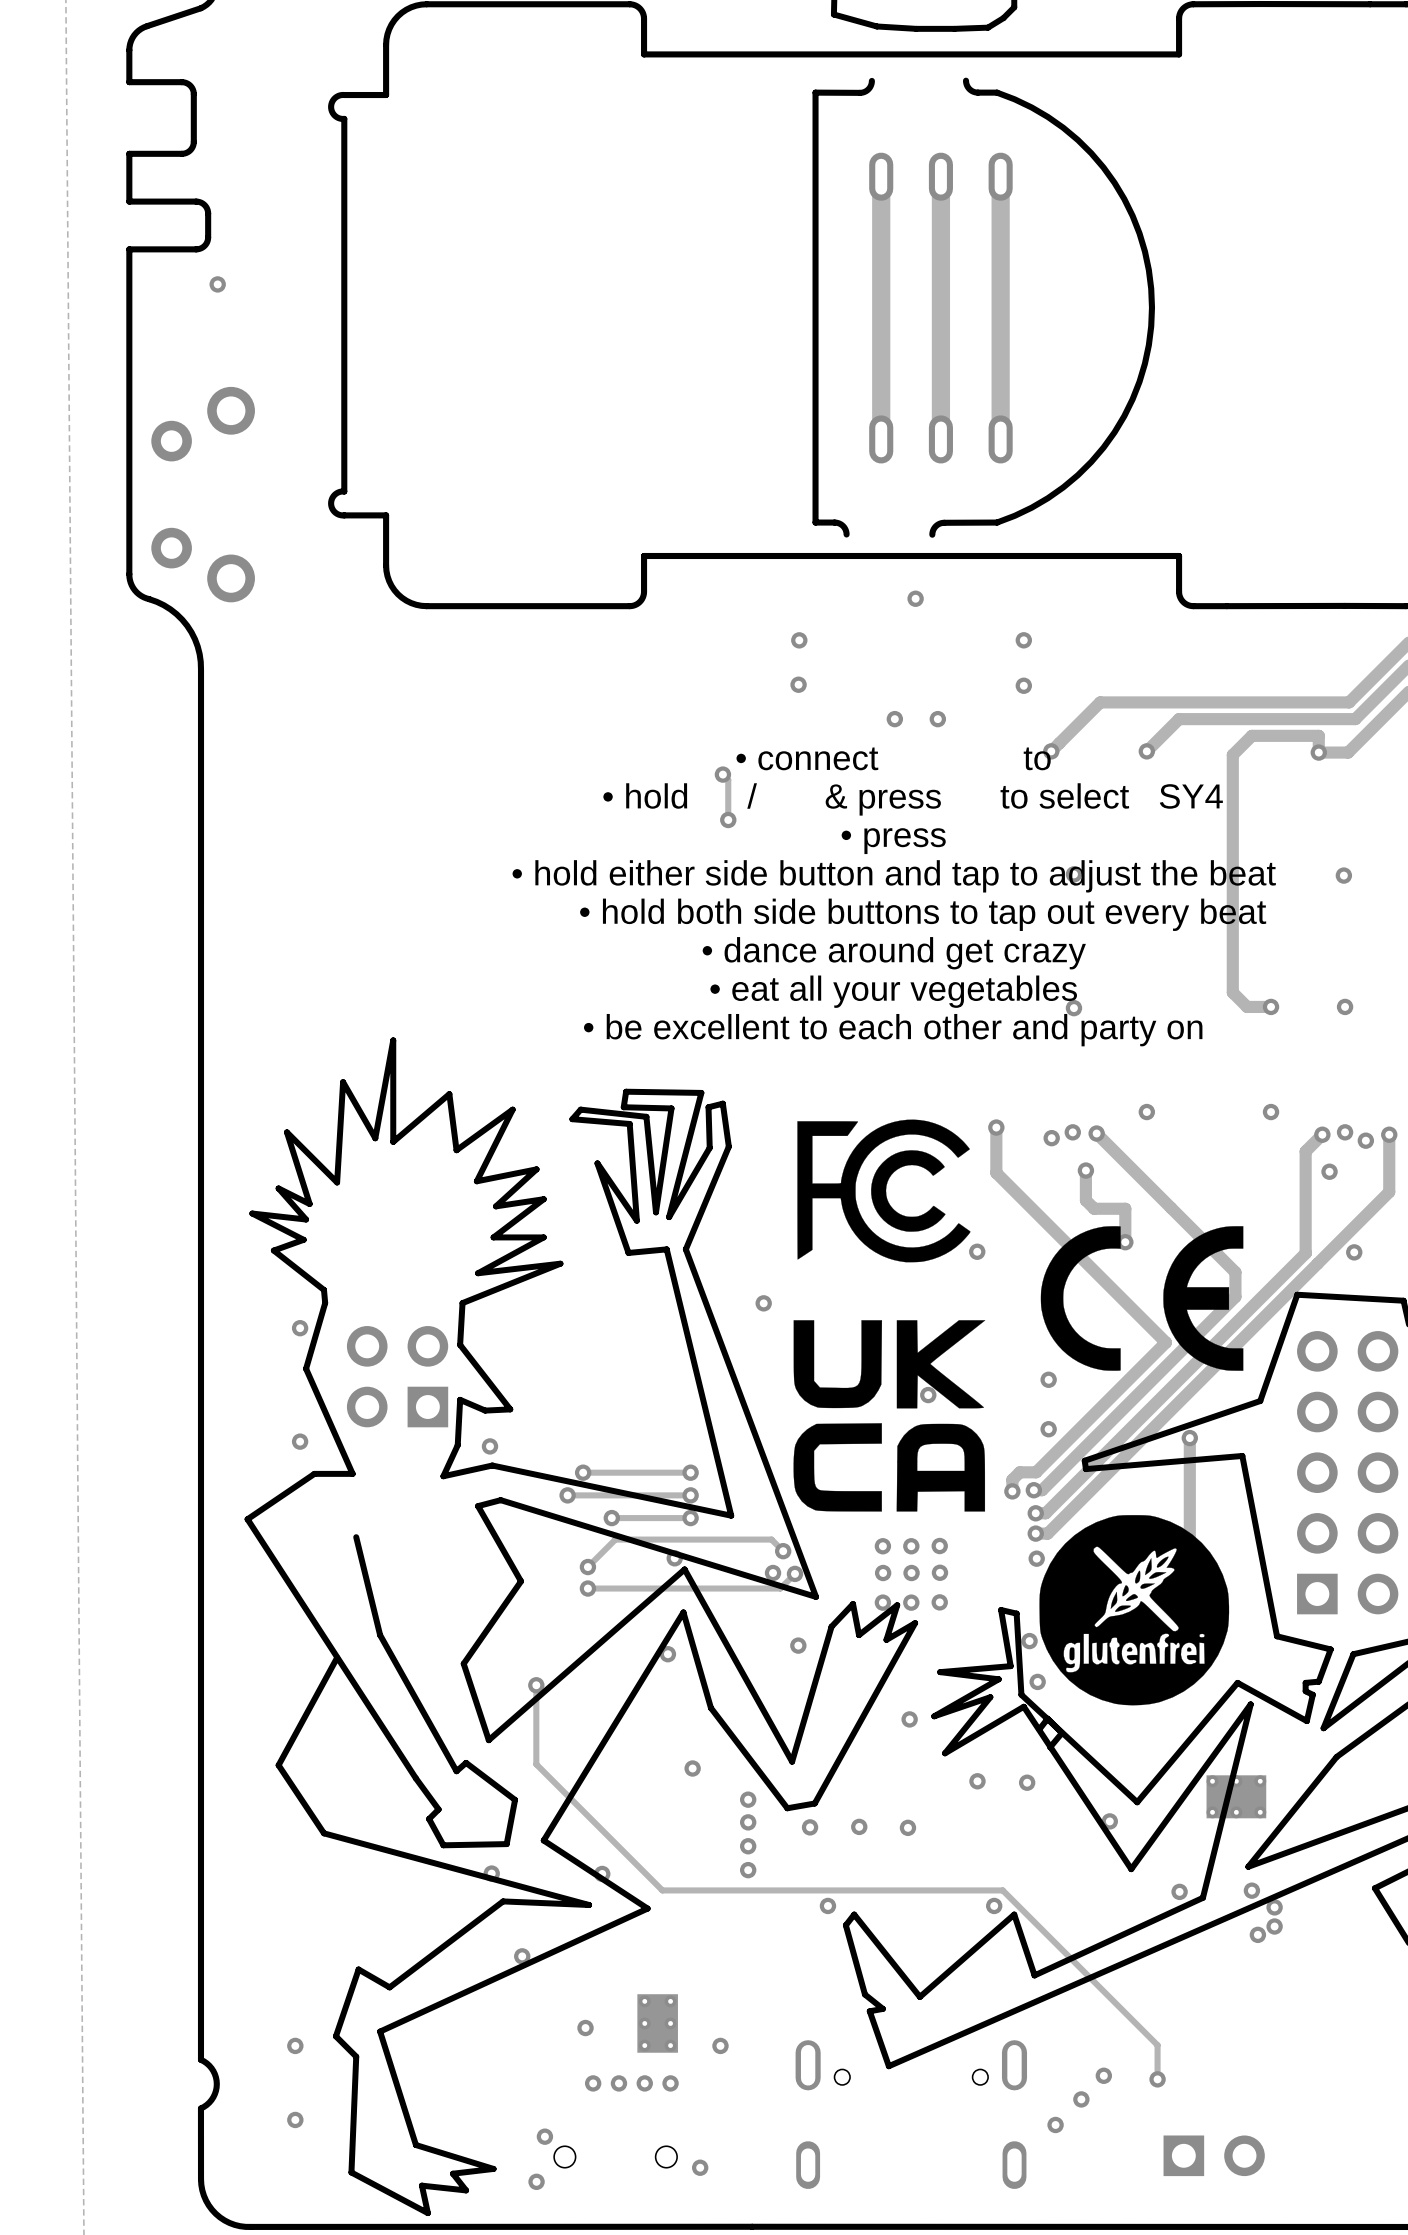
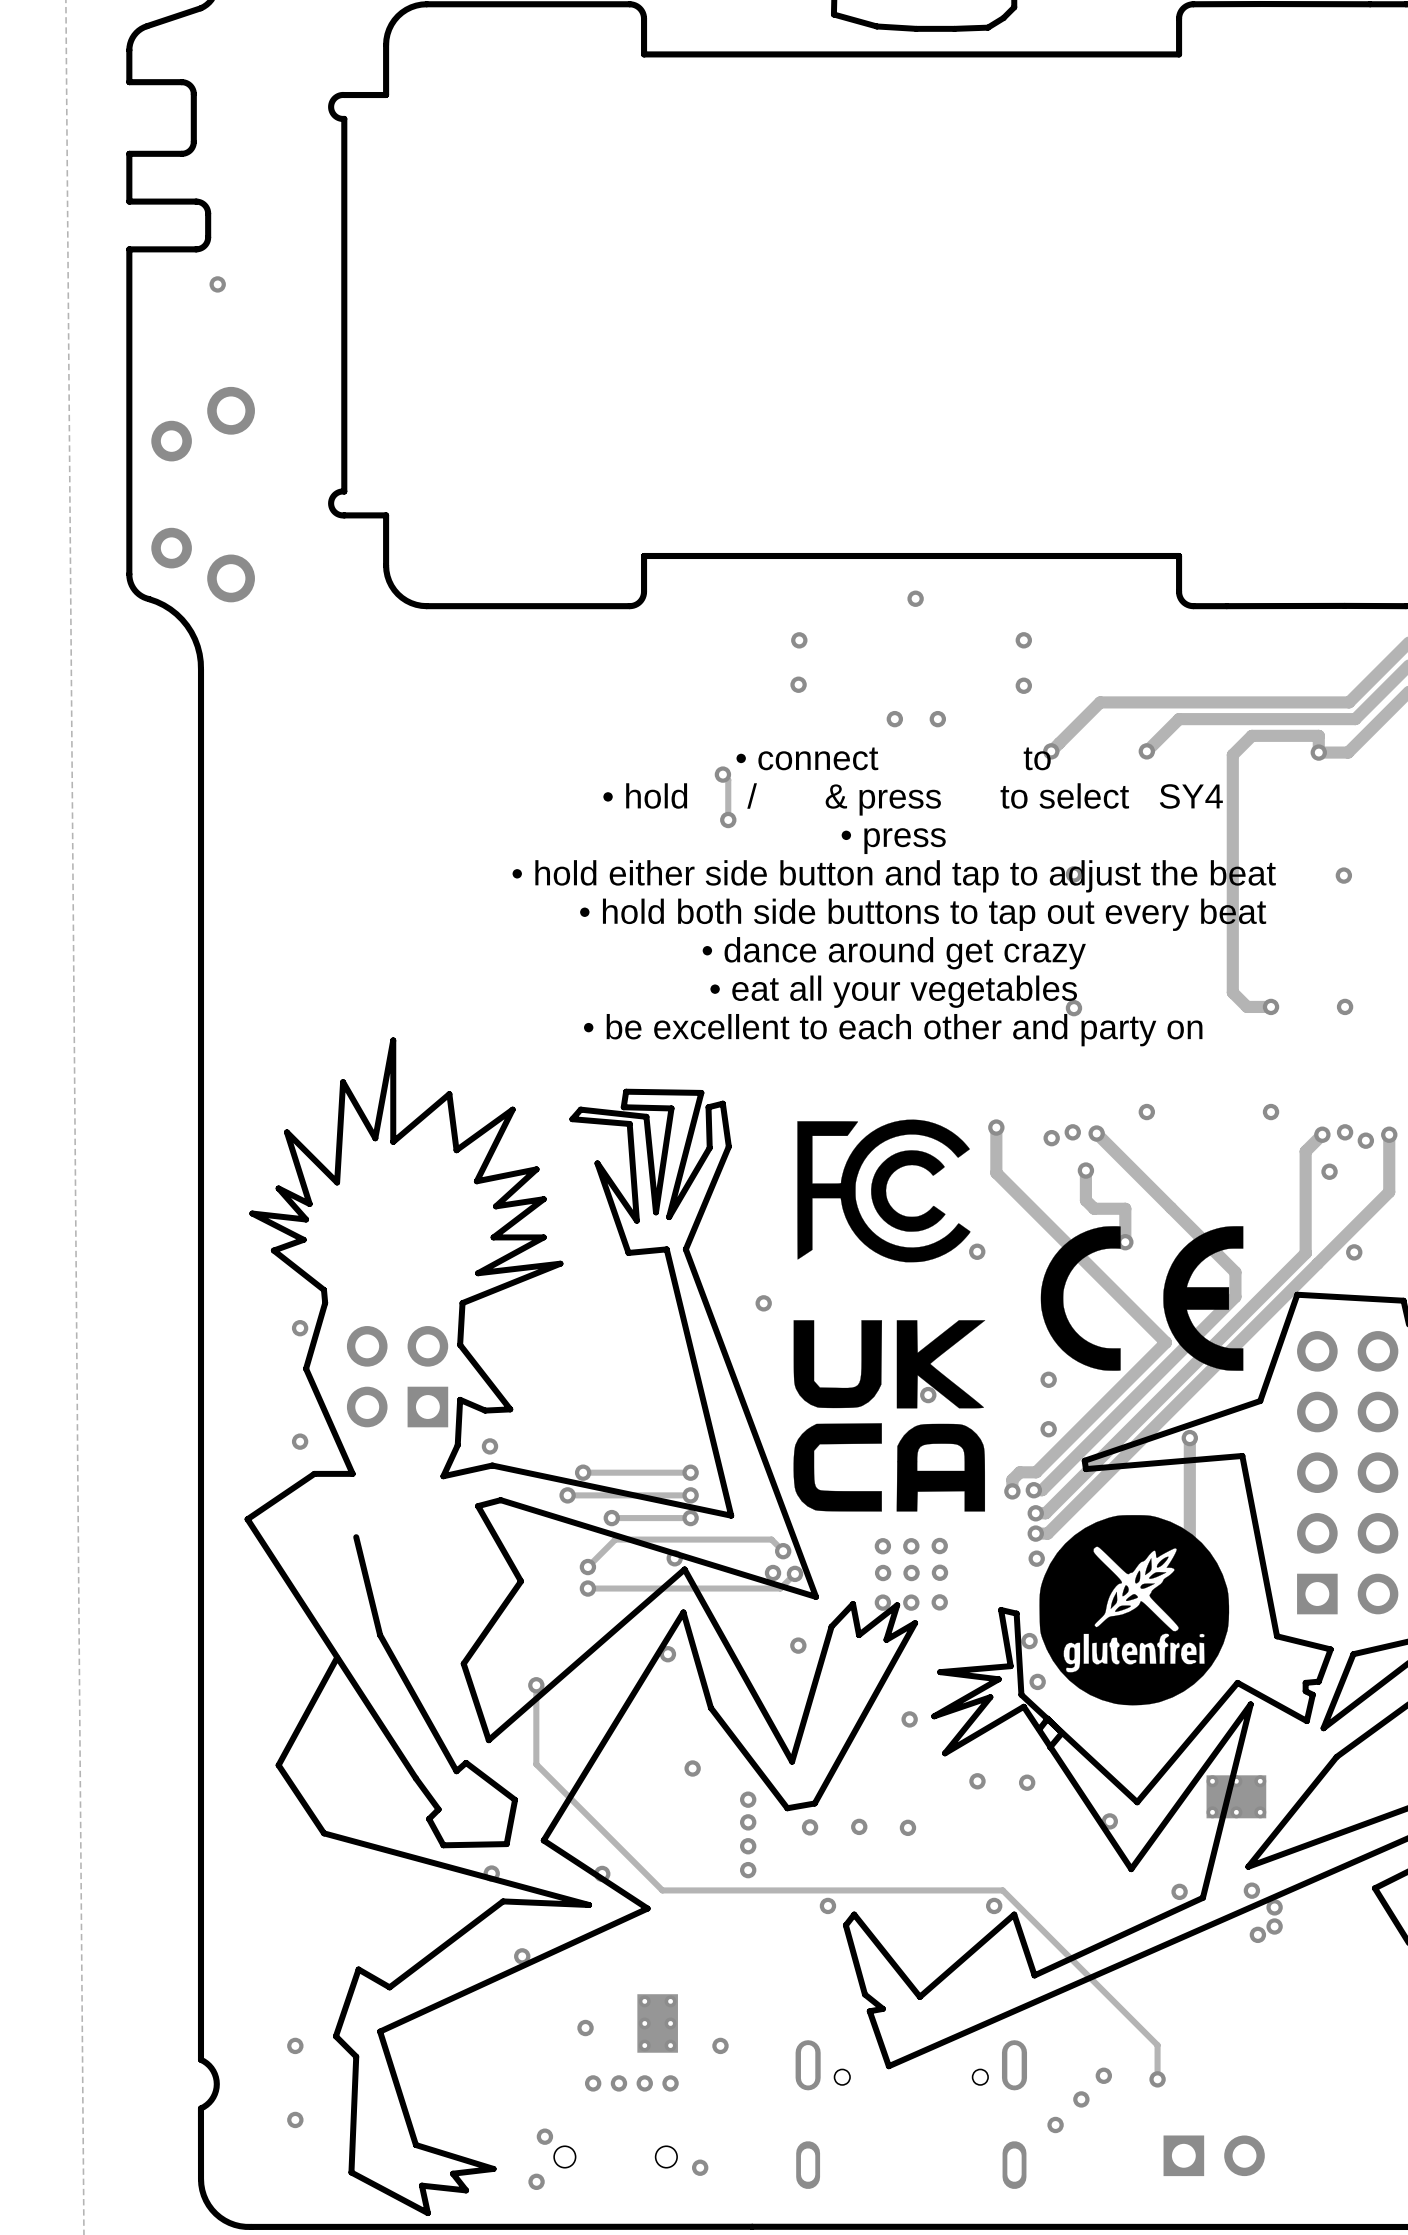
board edge: (871, 80) (869, 88) (863, 92) (815, 92) (815, 522) (839, 523) (844, 527) (846, 534) -> none
board edge: (966, 80) (968, 87) (973, 91) (997, 92) (1031, 107) (1047, 117) (1077, 139) (1103, 167) (1124, 199) (1139, 233) (1148, 270) (1151, 288) (1151, 326) (1144, 363) (1139, 381) (1124, 416) (1103, 447) (1077, 475) (1047, 498) (1014, 515) (997, 522) (941, 523) (934, 527) (932, 534) -> none
part: (940, 176) -> none
track: (1000, 176) (1000, 441) -> none
track: (881, 178) (881, 443) -> none
track: (940, 178) (940, 443) -> none
part: (940, 439) -> none

